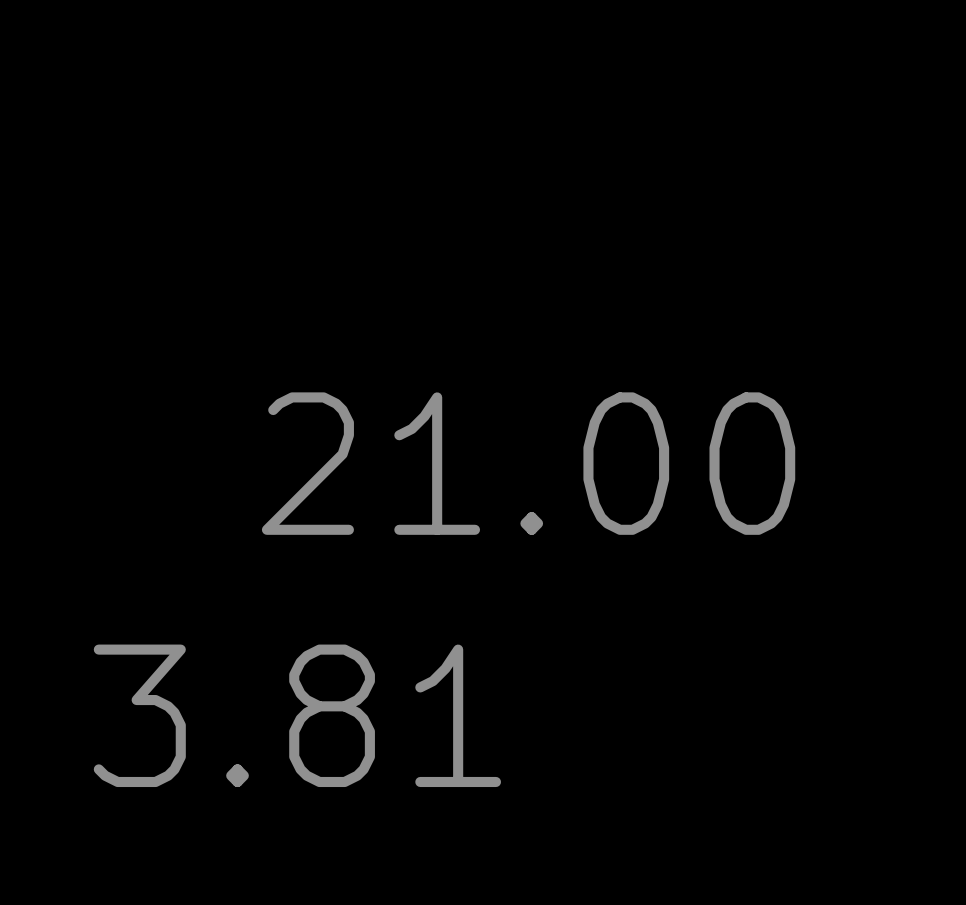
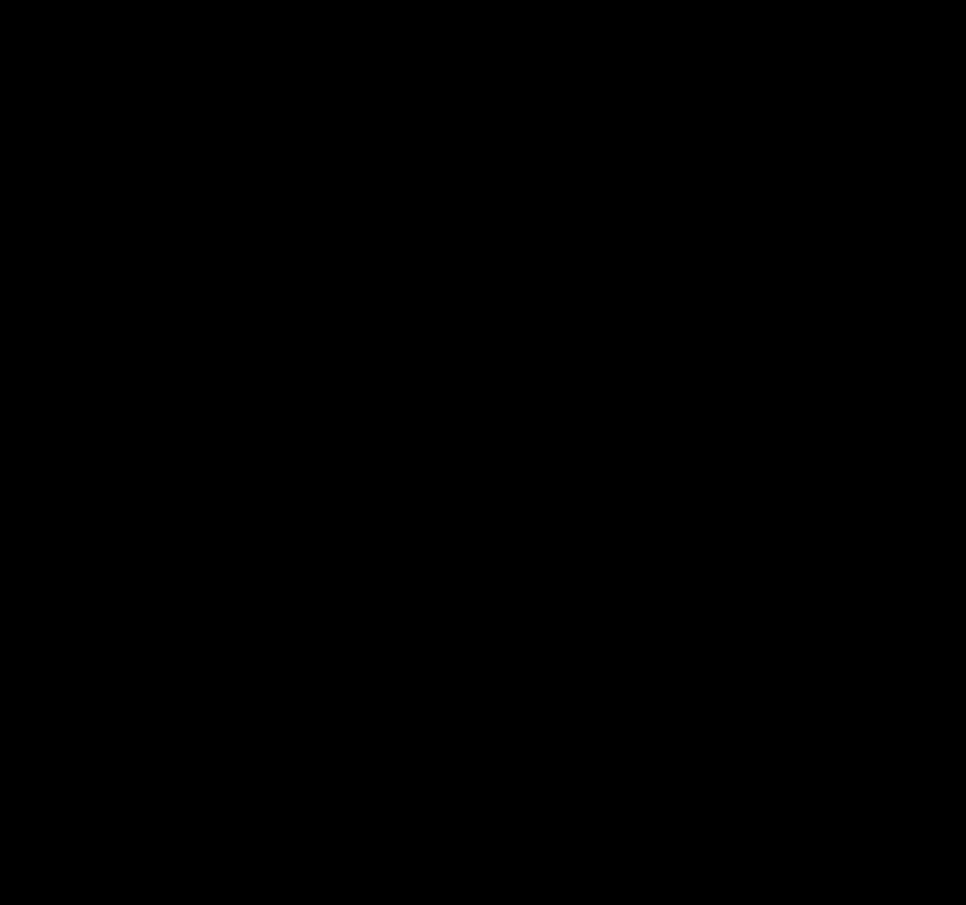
text: 21.00 (528, 463) -> none
text: 3.81 (297, 715) -> none

